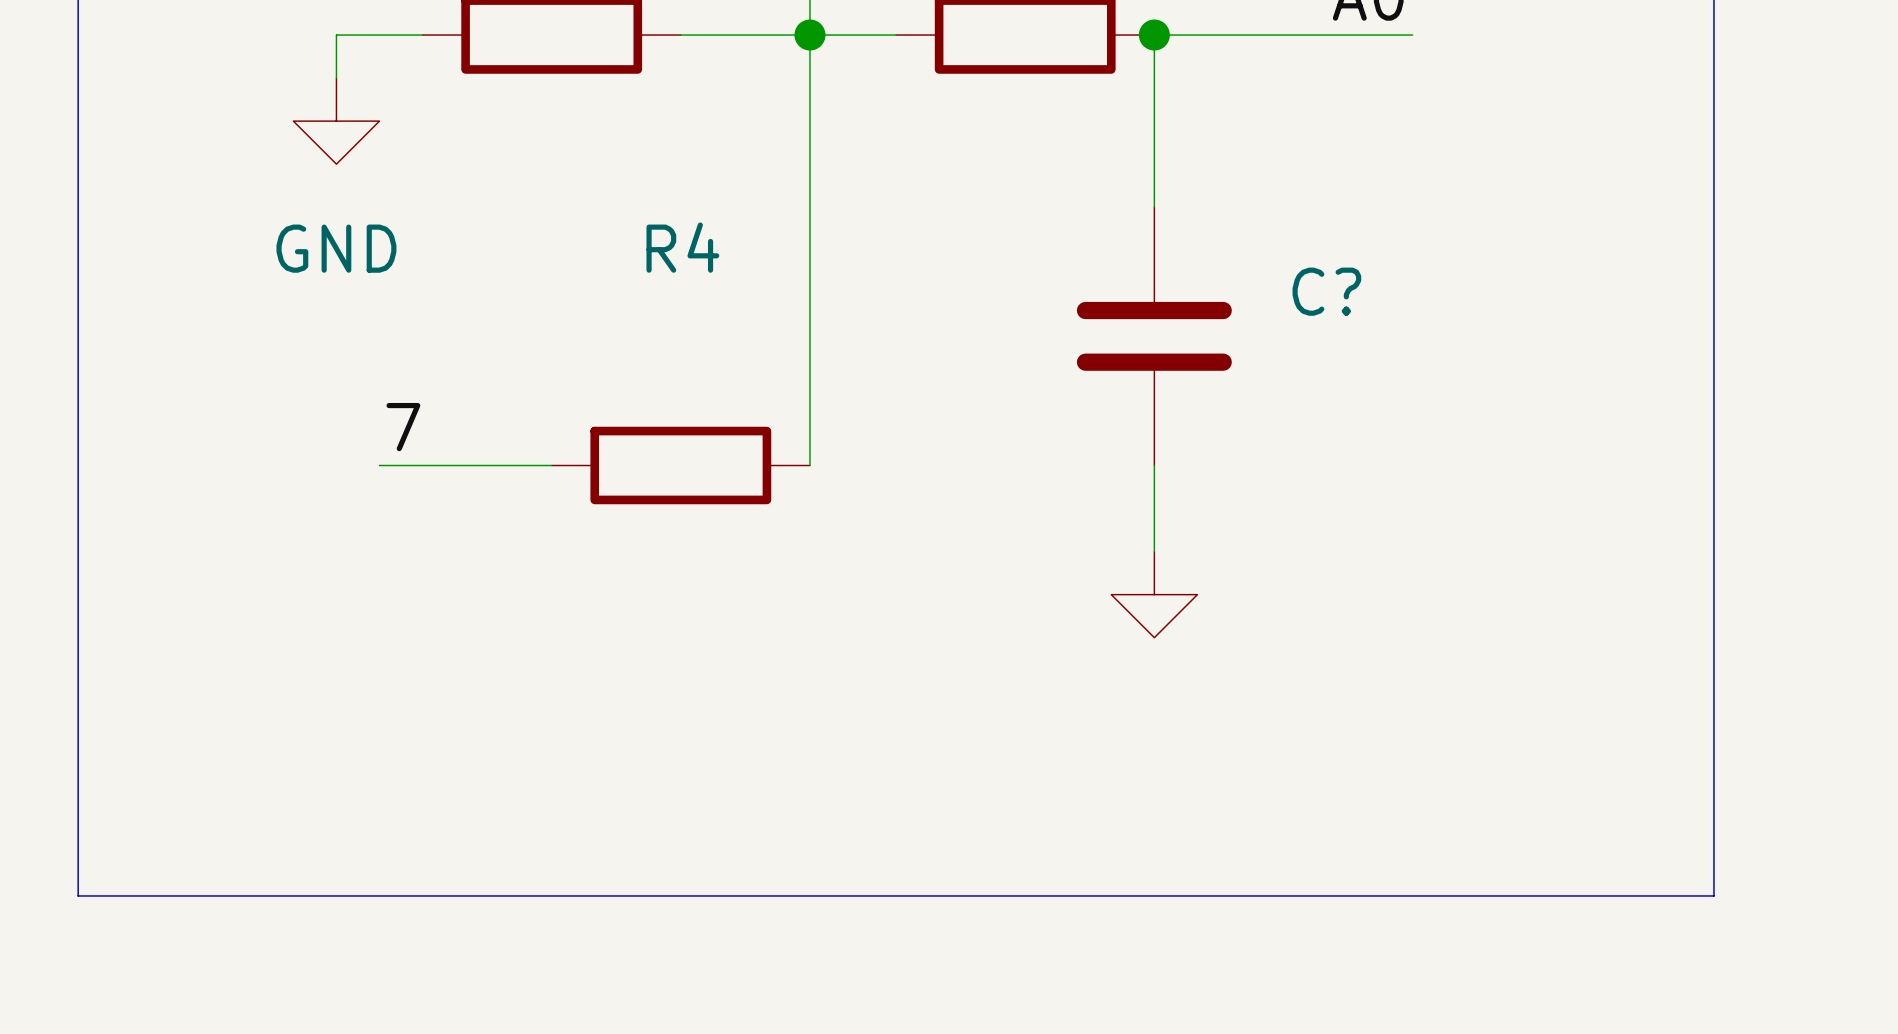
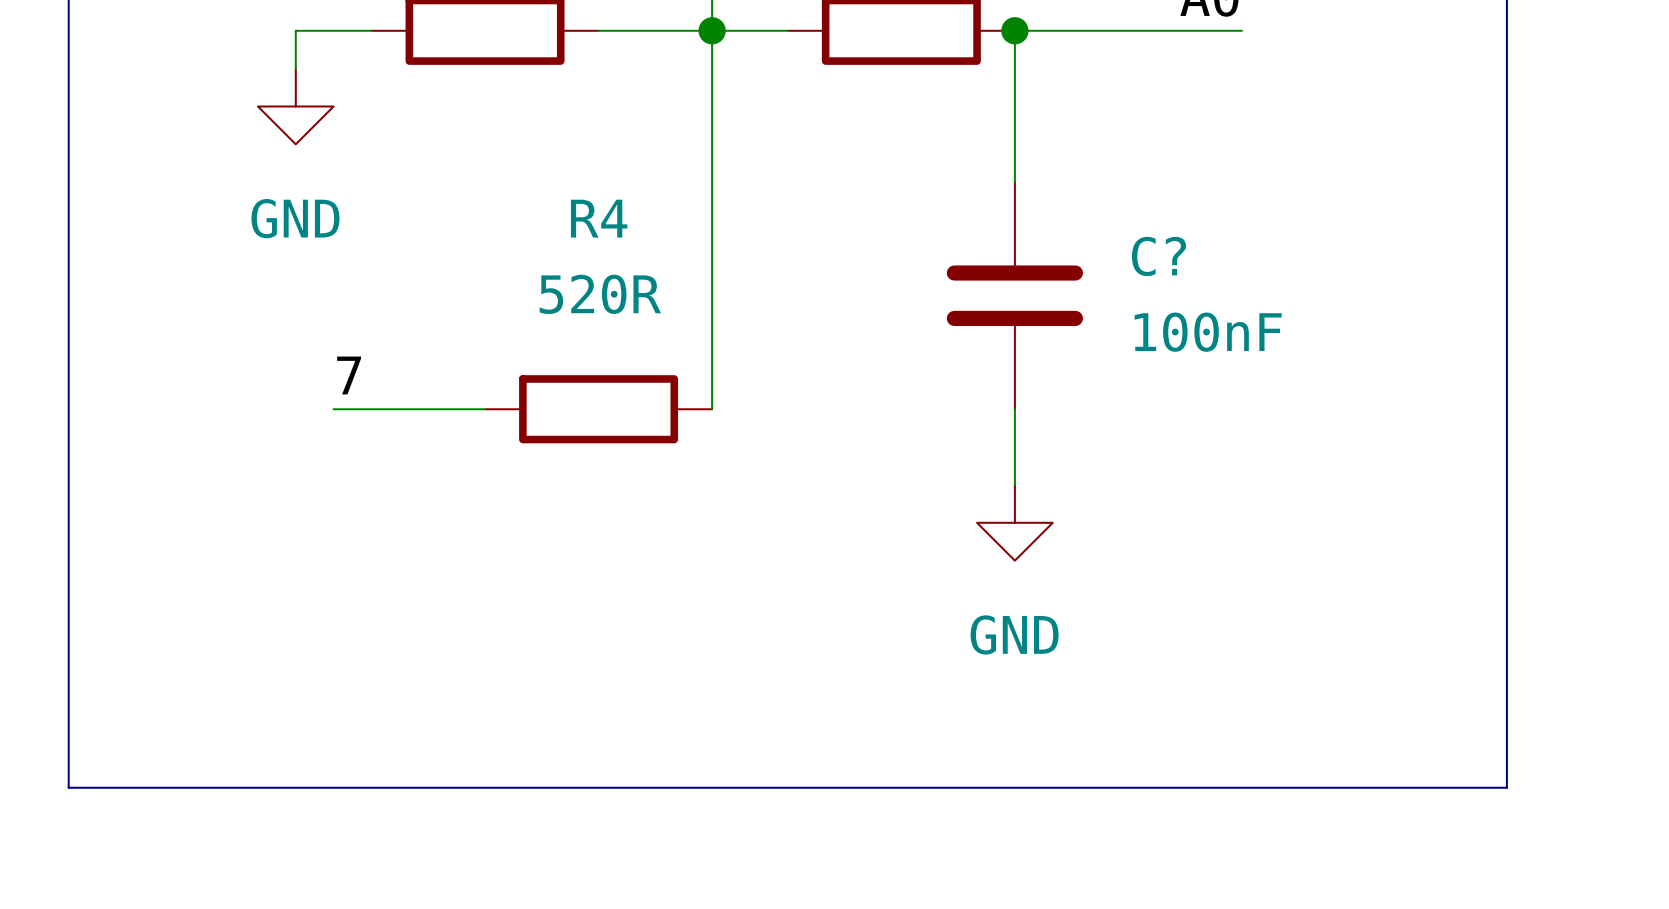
R4 value: none -> 520R (600, 294)
C? value: none -> 100nF (1208, 332)
power symbol text: none -> GND (1014, 634)

